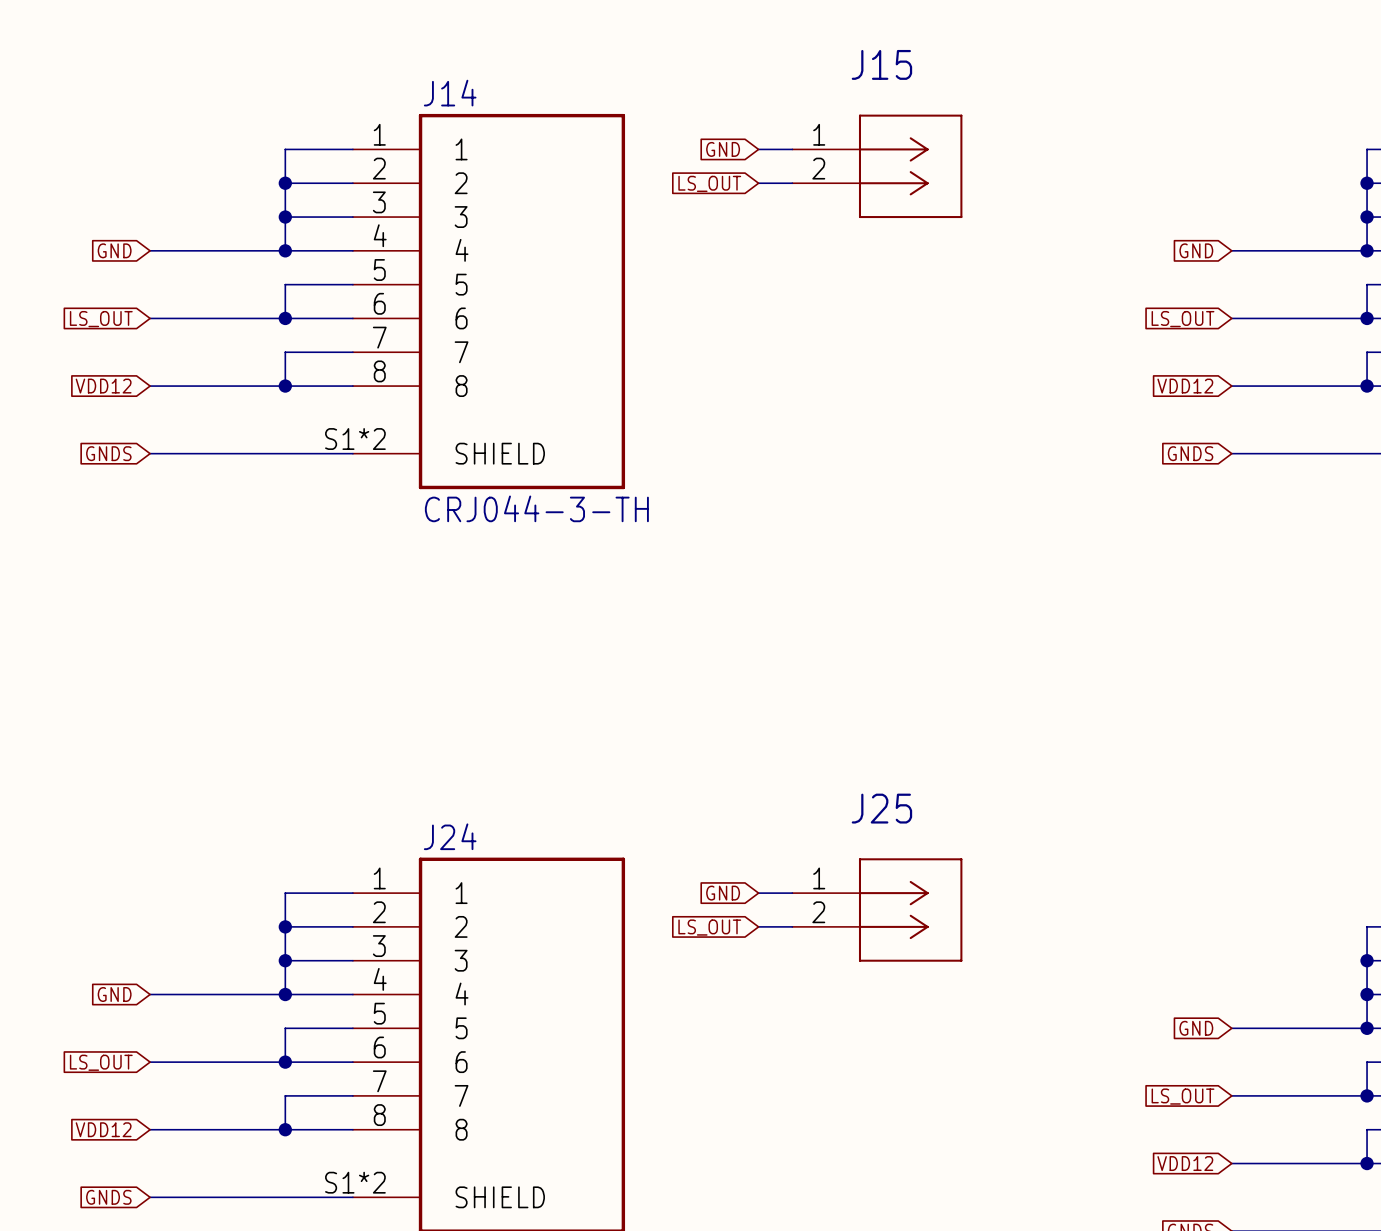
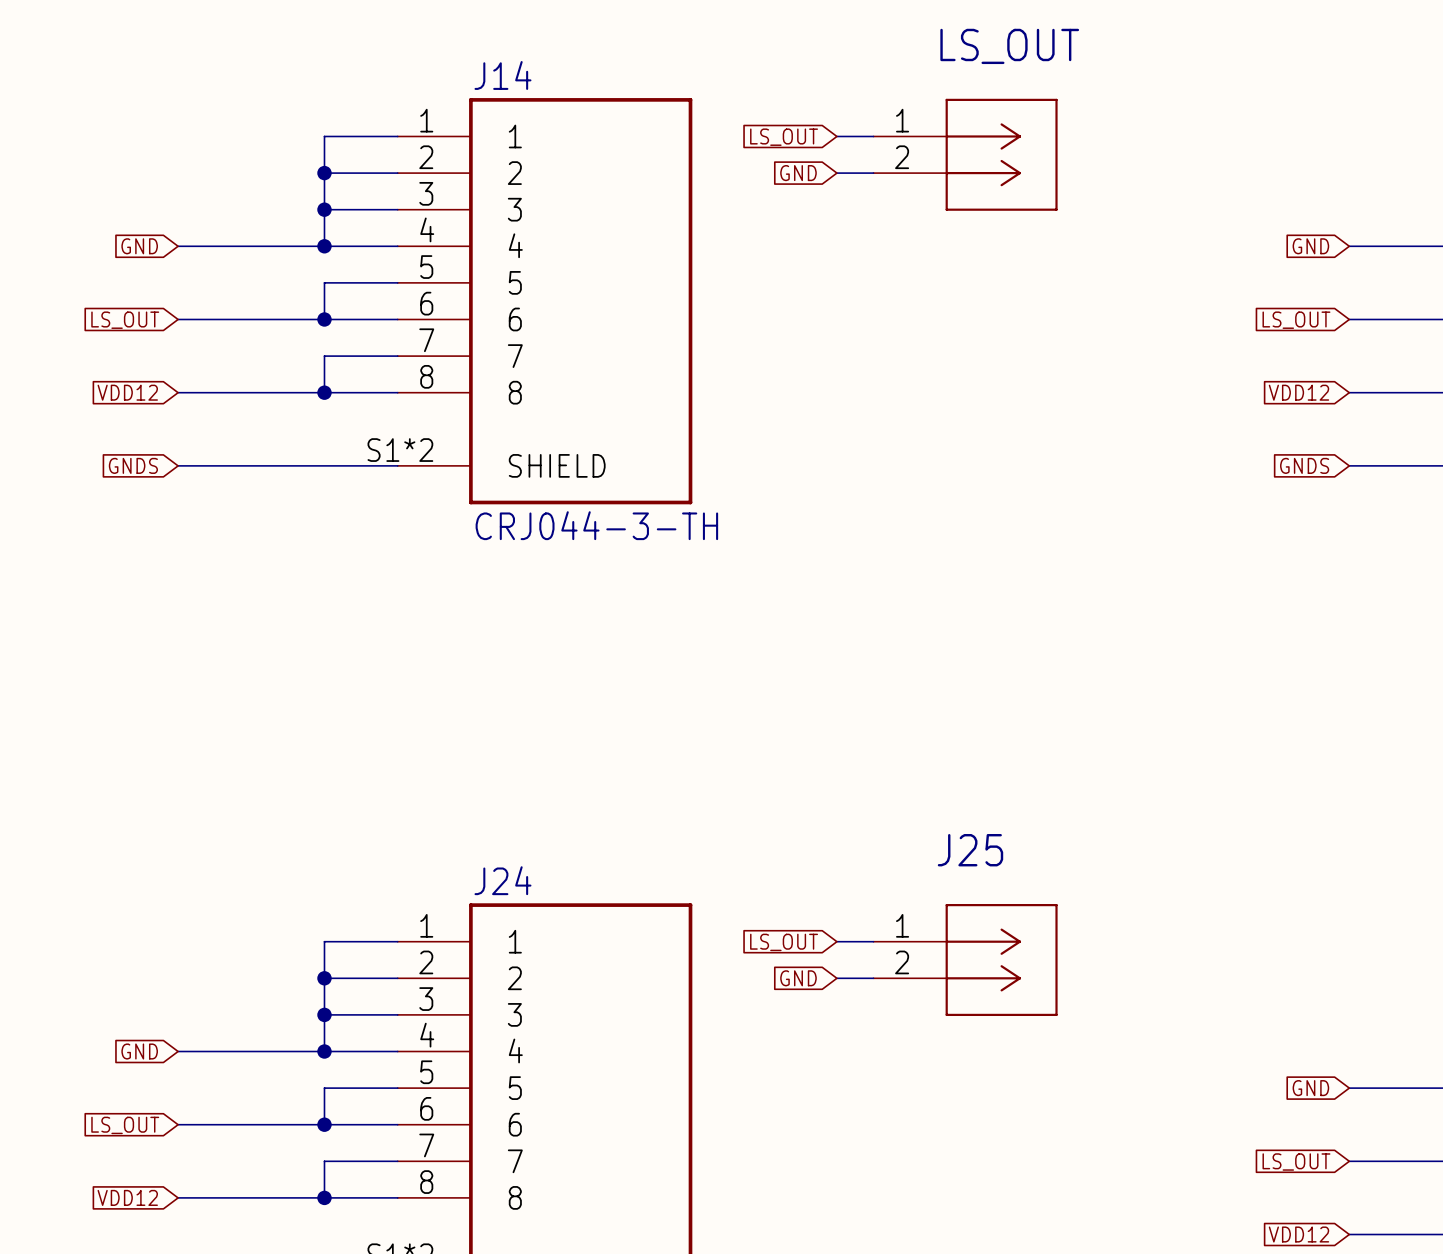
J15 name: J15 (881, 64) -> LS_OUT (1009, 46)
global label: GND (723, 149) -> LS_OUT (784, 137)
global label: LS_OUT (709, 183) -> GND (798, 173)
global label: GND (723, 893) -> LS_OUT (784, 942)
global label: LS_OUT (709, 927) -> GND (798, 978)

